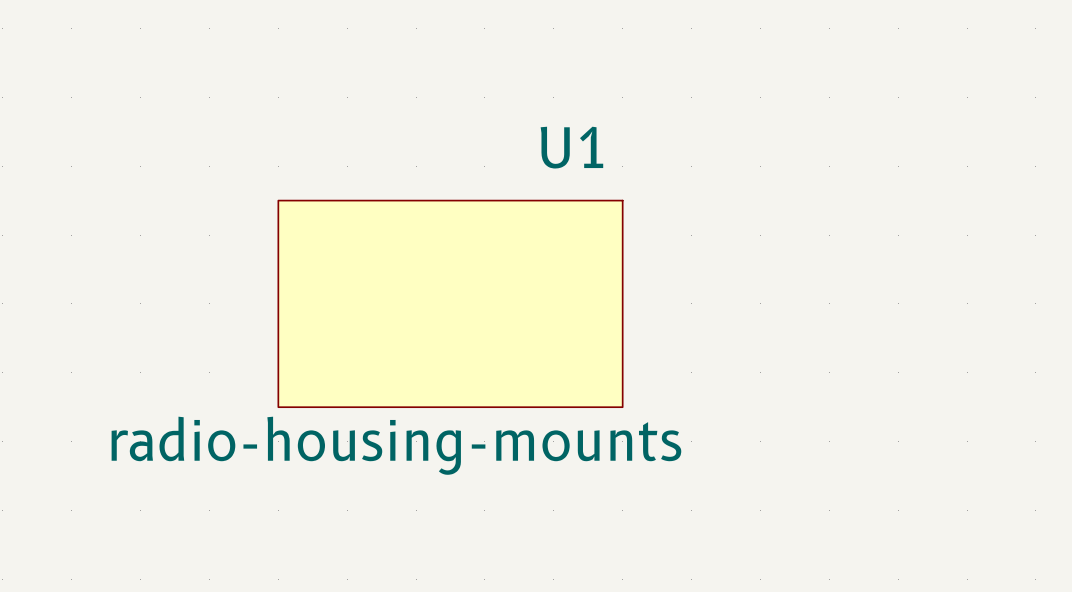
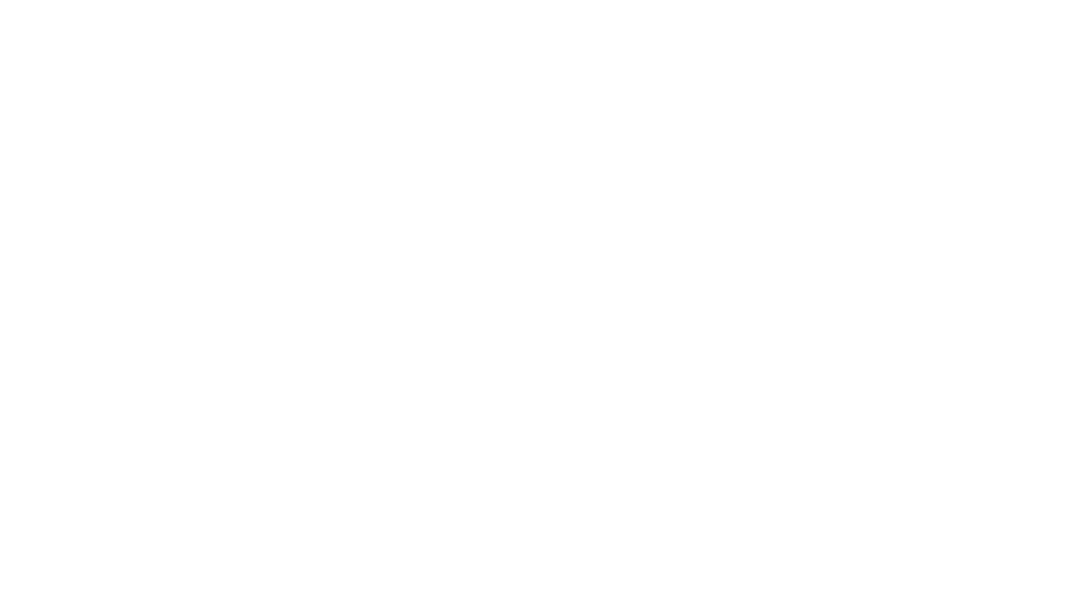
U1: radio-housing-mounts (450, 303) -> none

